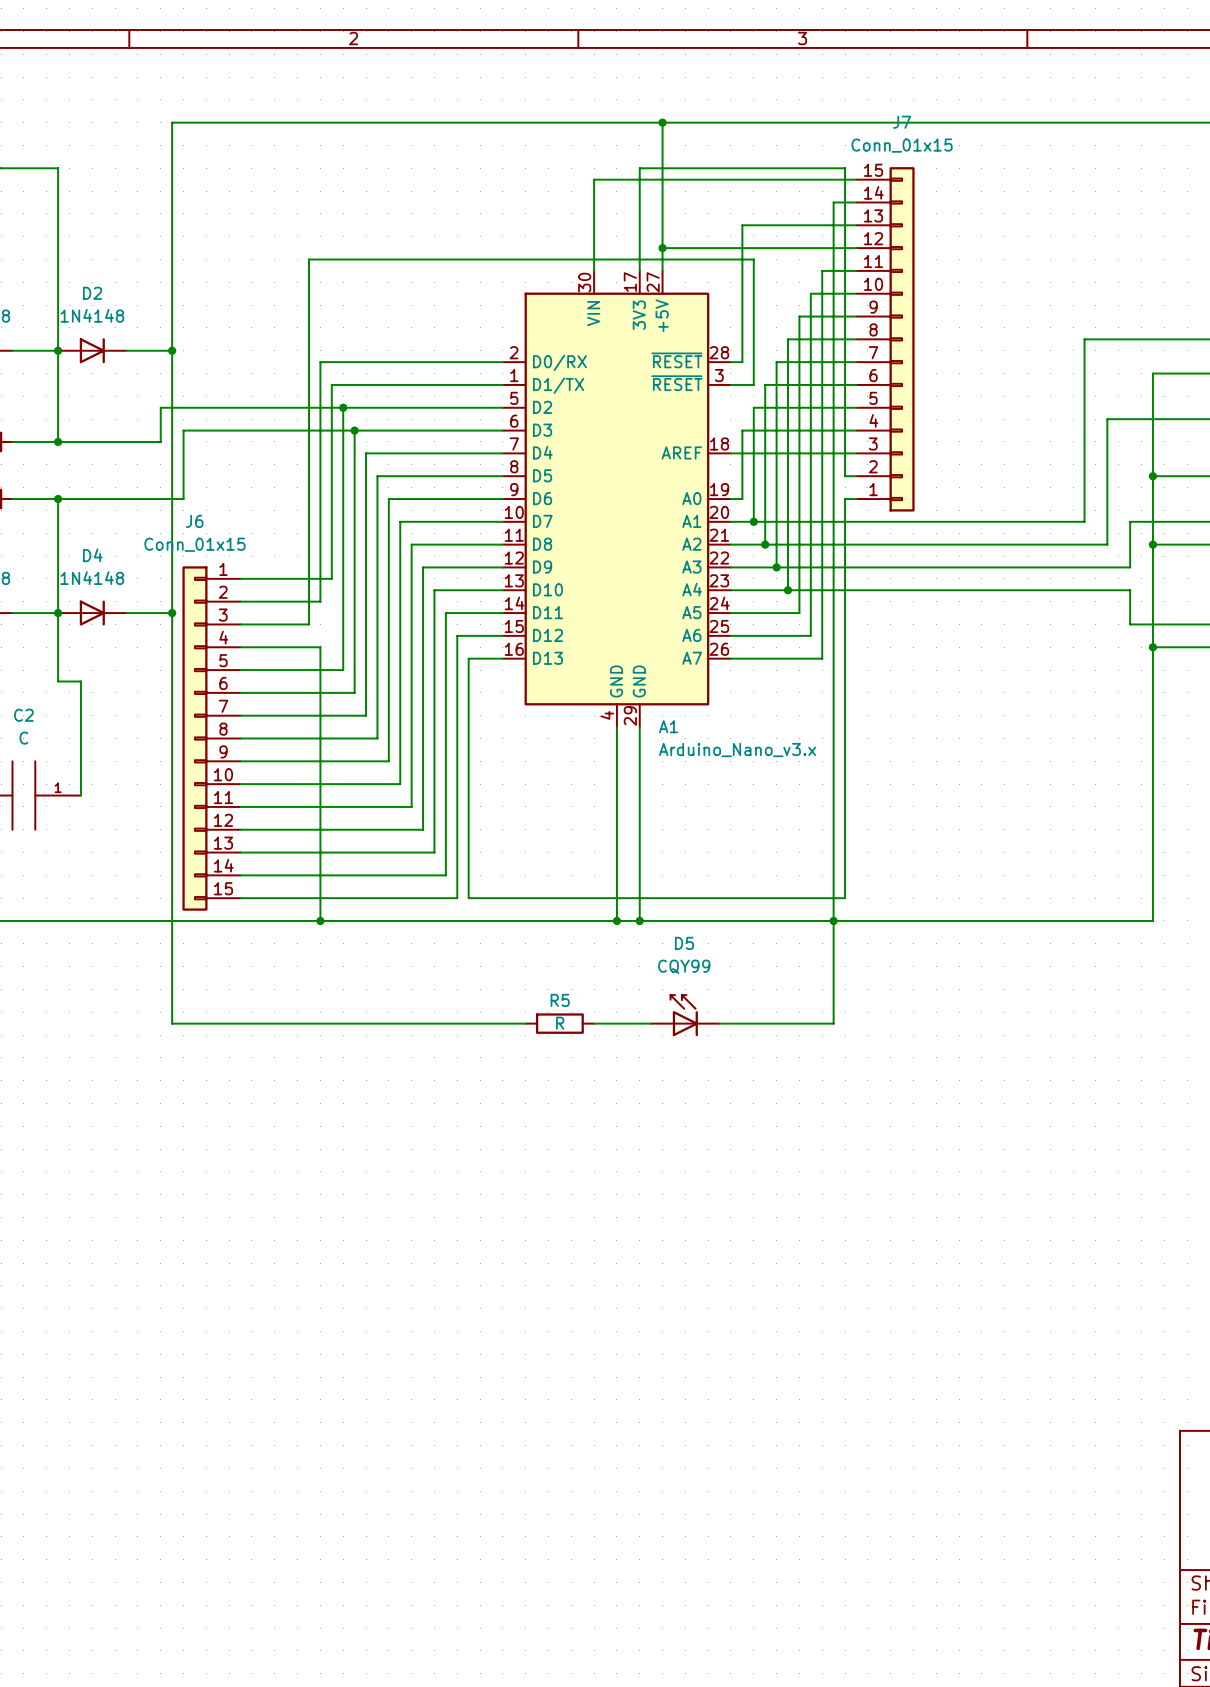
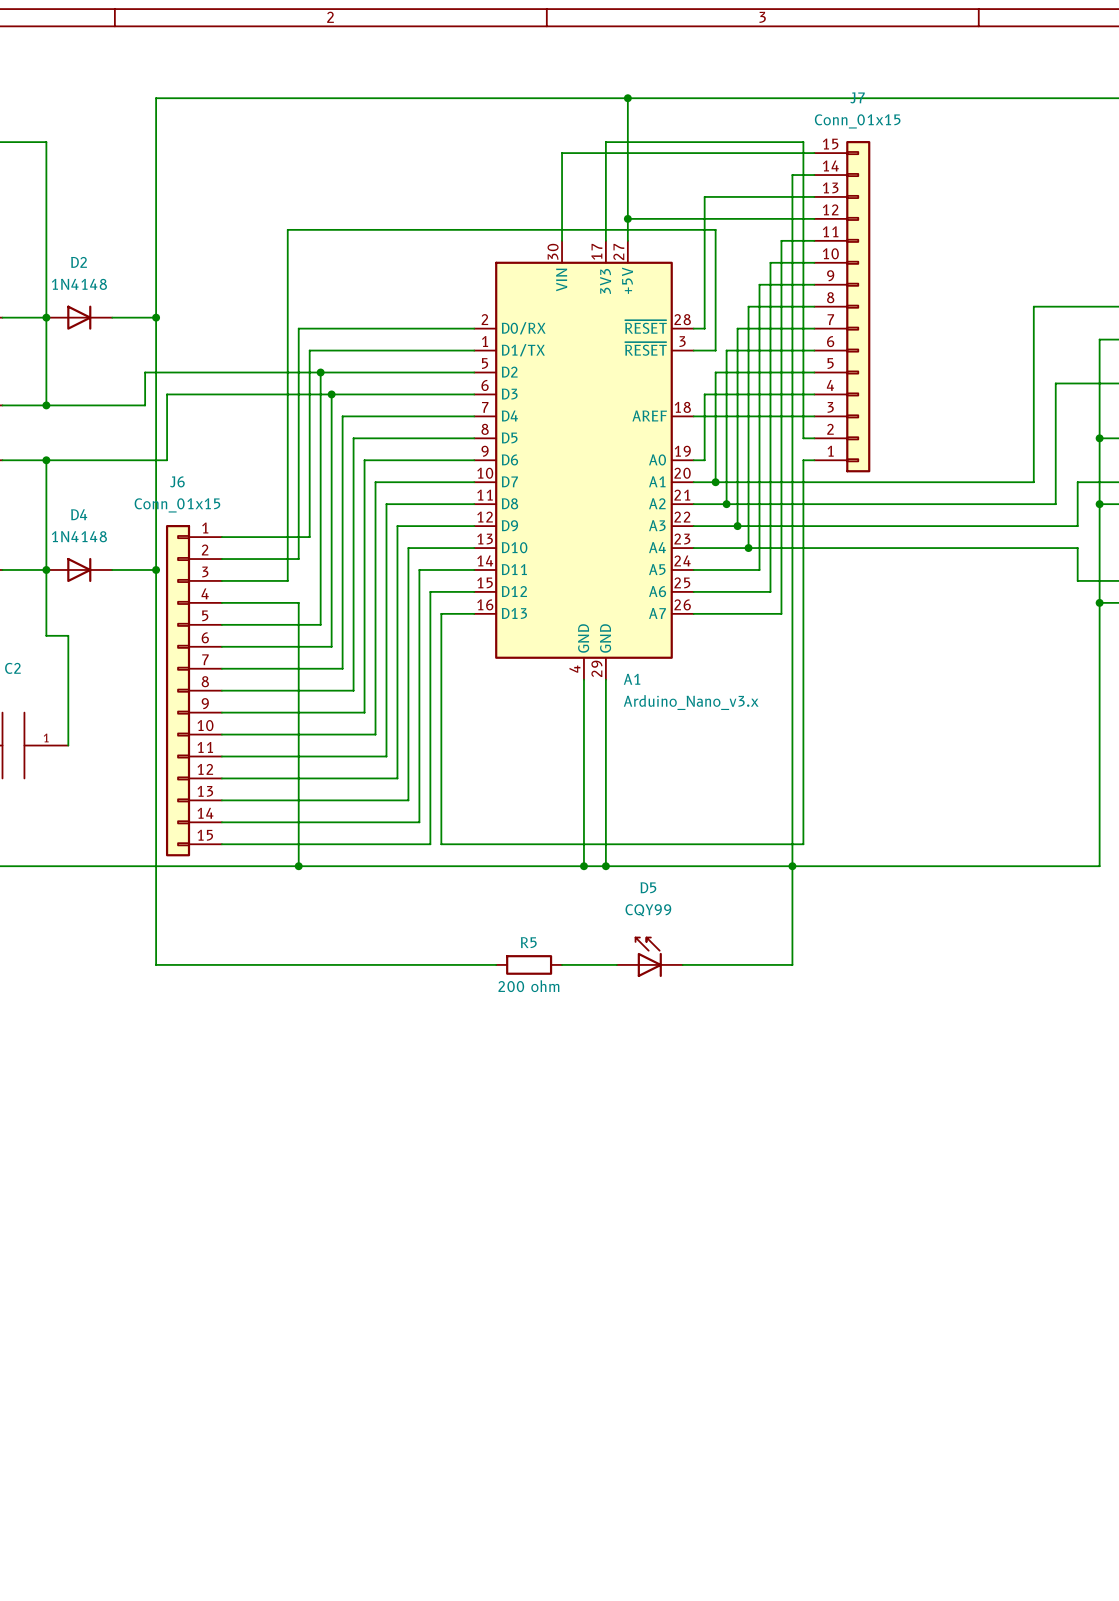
C2 value: C (23, 738) -> none
R5 value: R (560, 1023) -> 200 ohm (528, 986)

